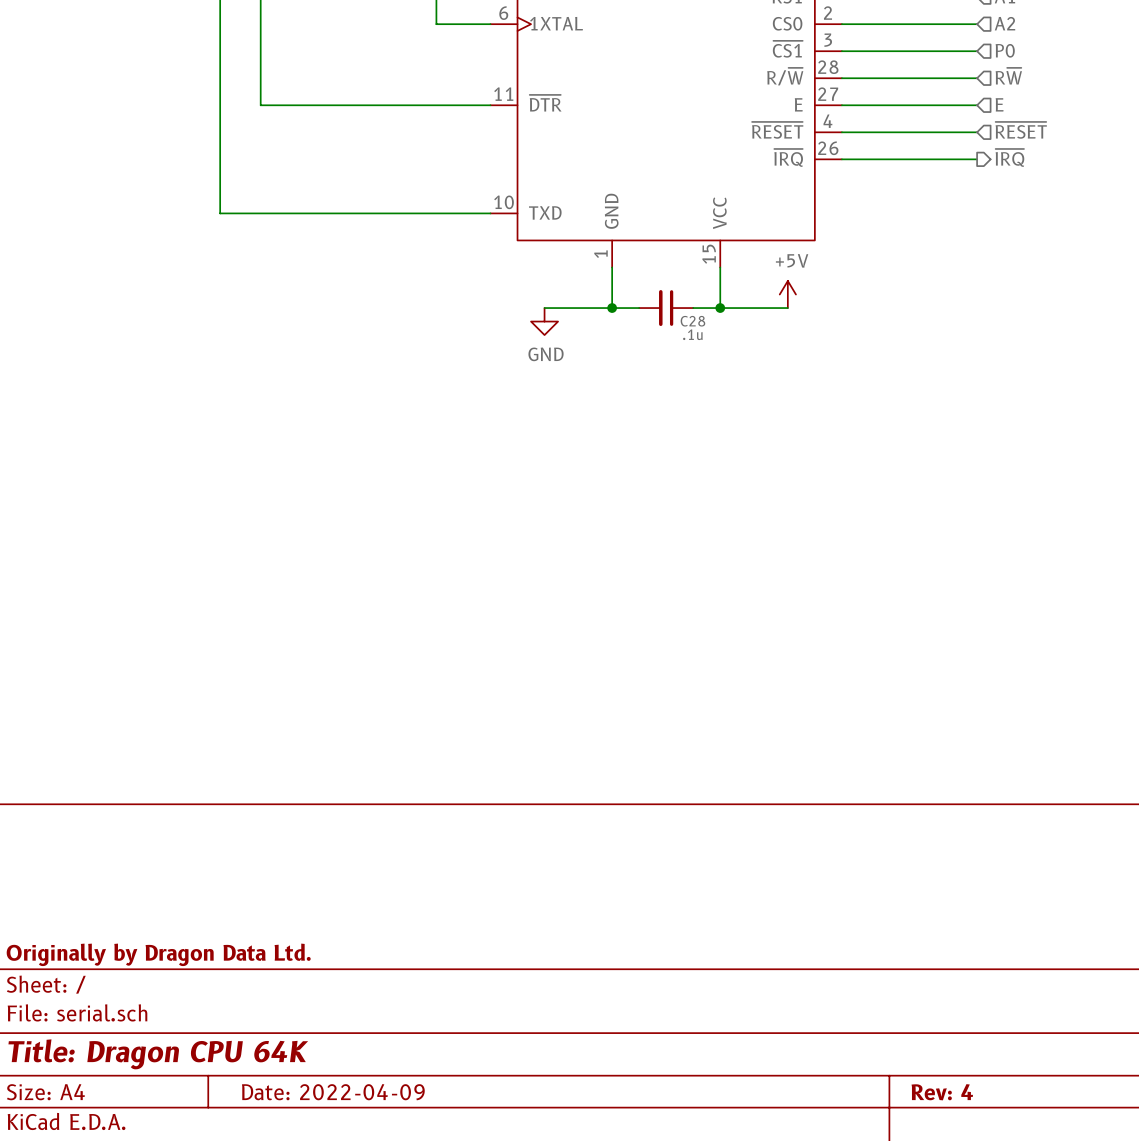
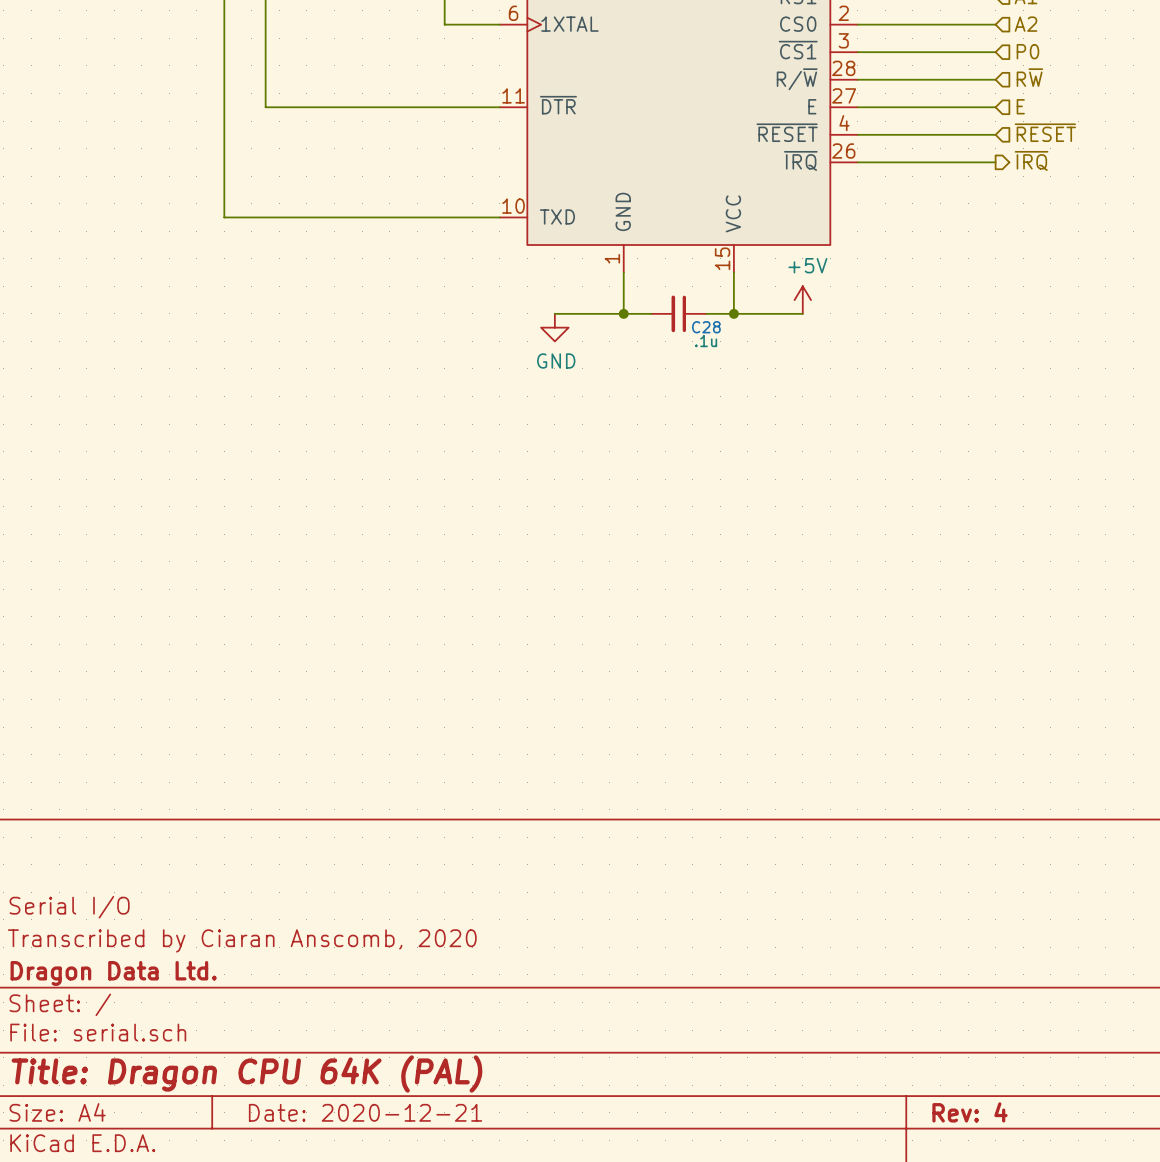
title block: none -> Serial I/O (69, 907)
title block: none -> Transcribed by Ciaran Anscomb, 2020 (242, 940)
title block: Originally by Dragon Data Ltd. (158, 954) -> Dragon Data Ltd. (113, 973)
title block: Title: Dragon CPU 64K (158, 1054) -> Title: Dragon CPU 64K (PAL) (247, 1073)
title block: Date: 2022-04-09 (333, 1092) -> Date: 2020-12-21 (365, 1112)

